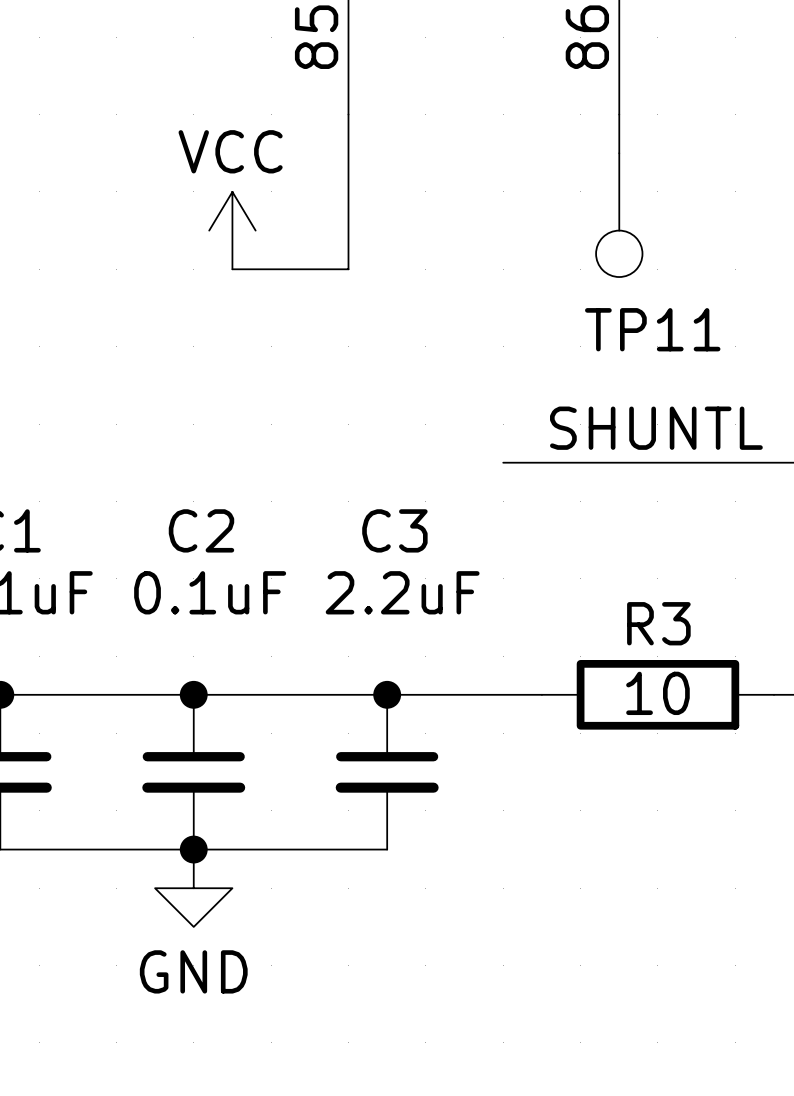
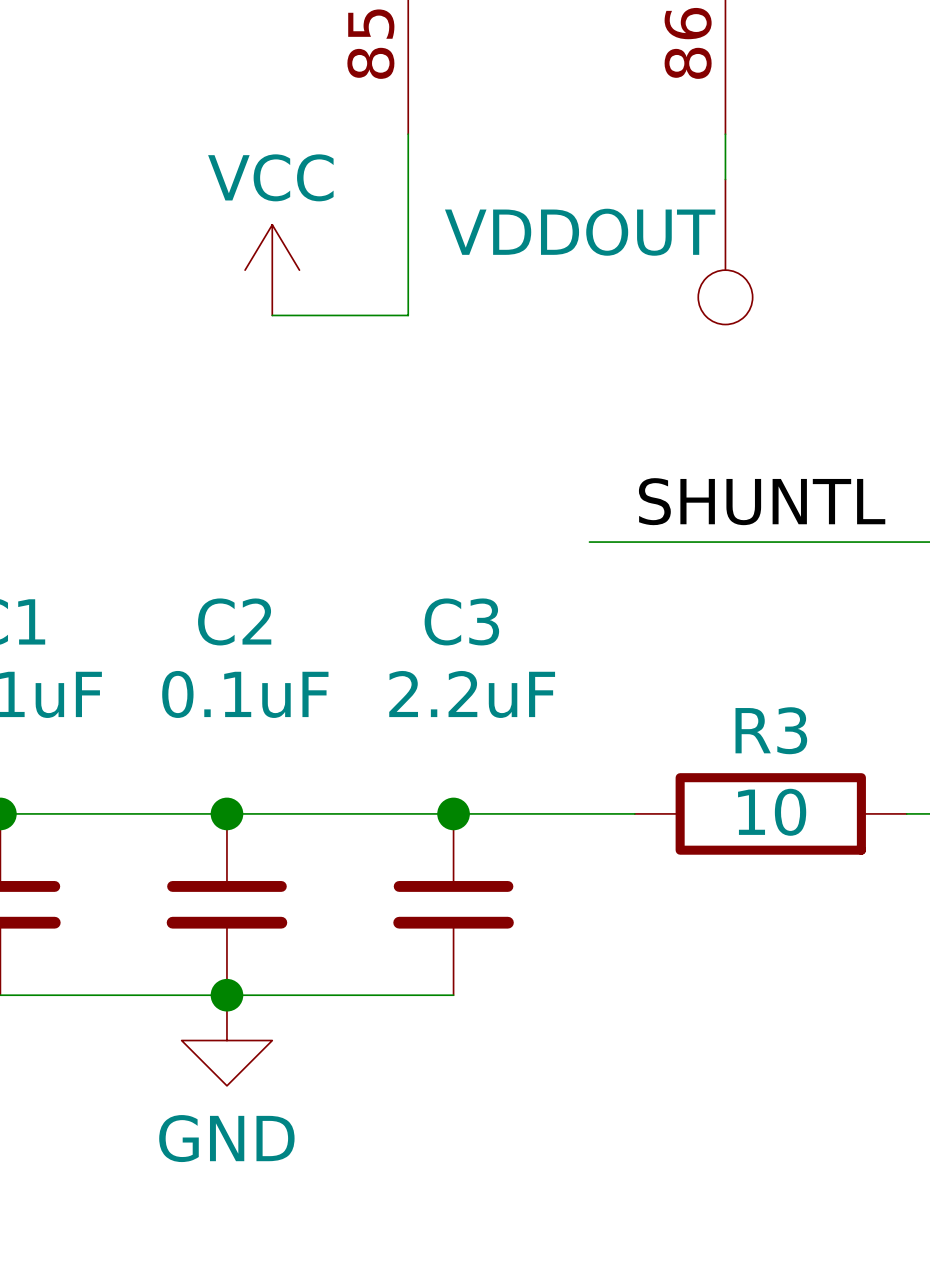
TP11 value: none -> VDDOUT (580, 232)
TP11 name: TP11 (652, 329) -> none

